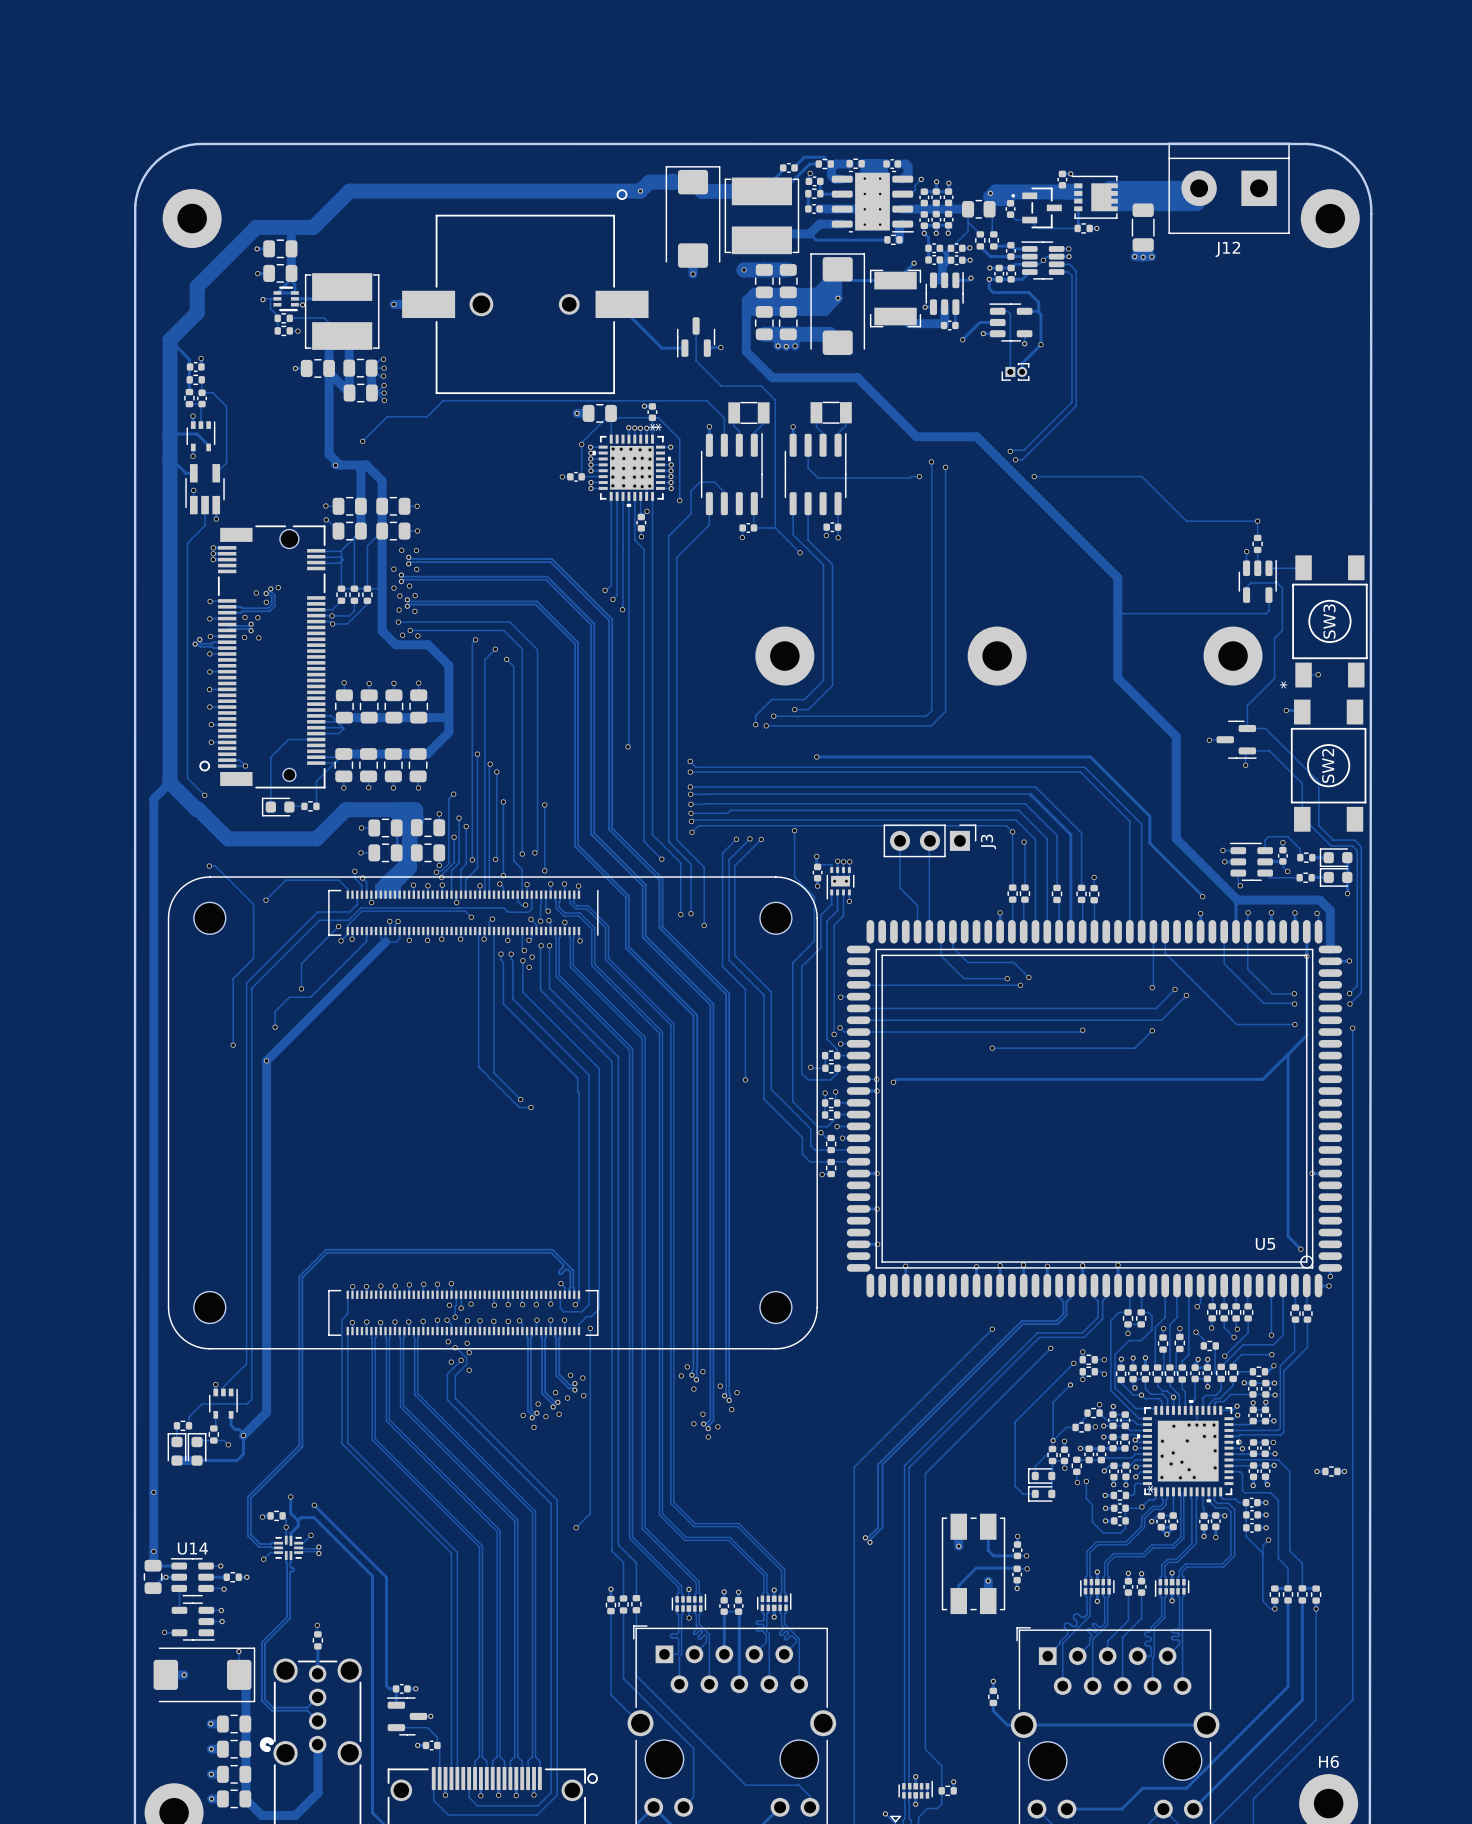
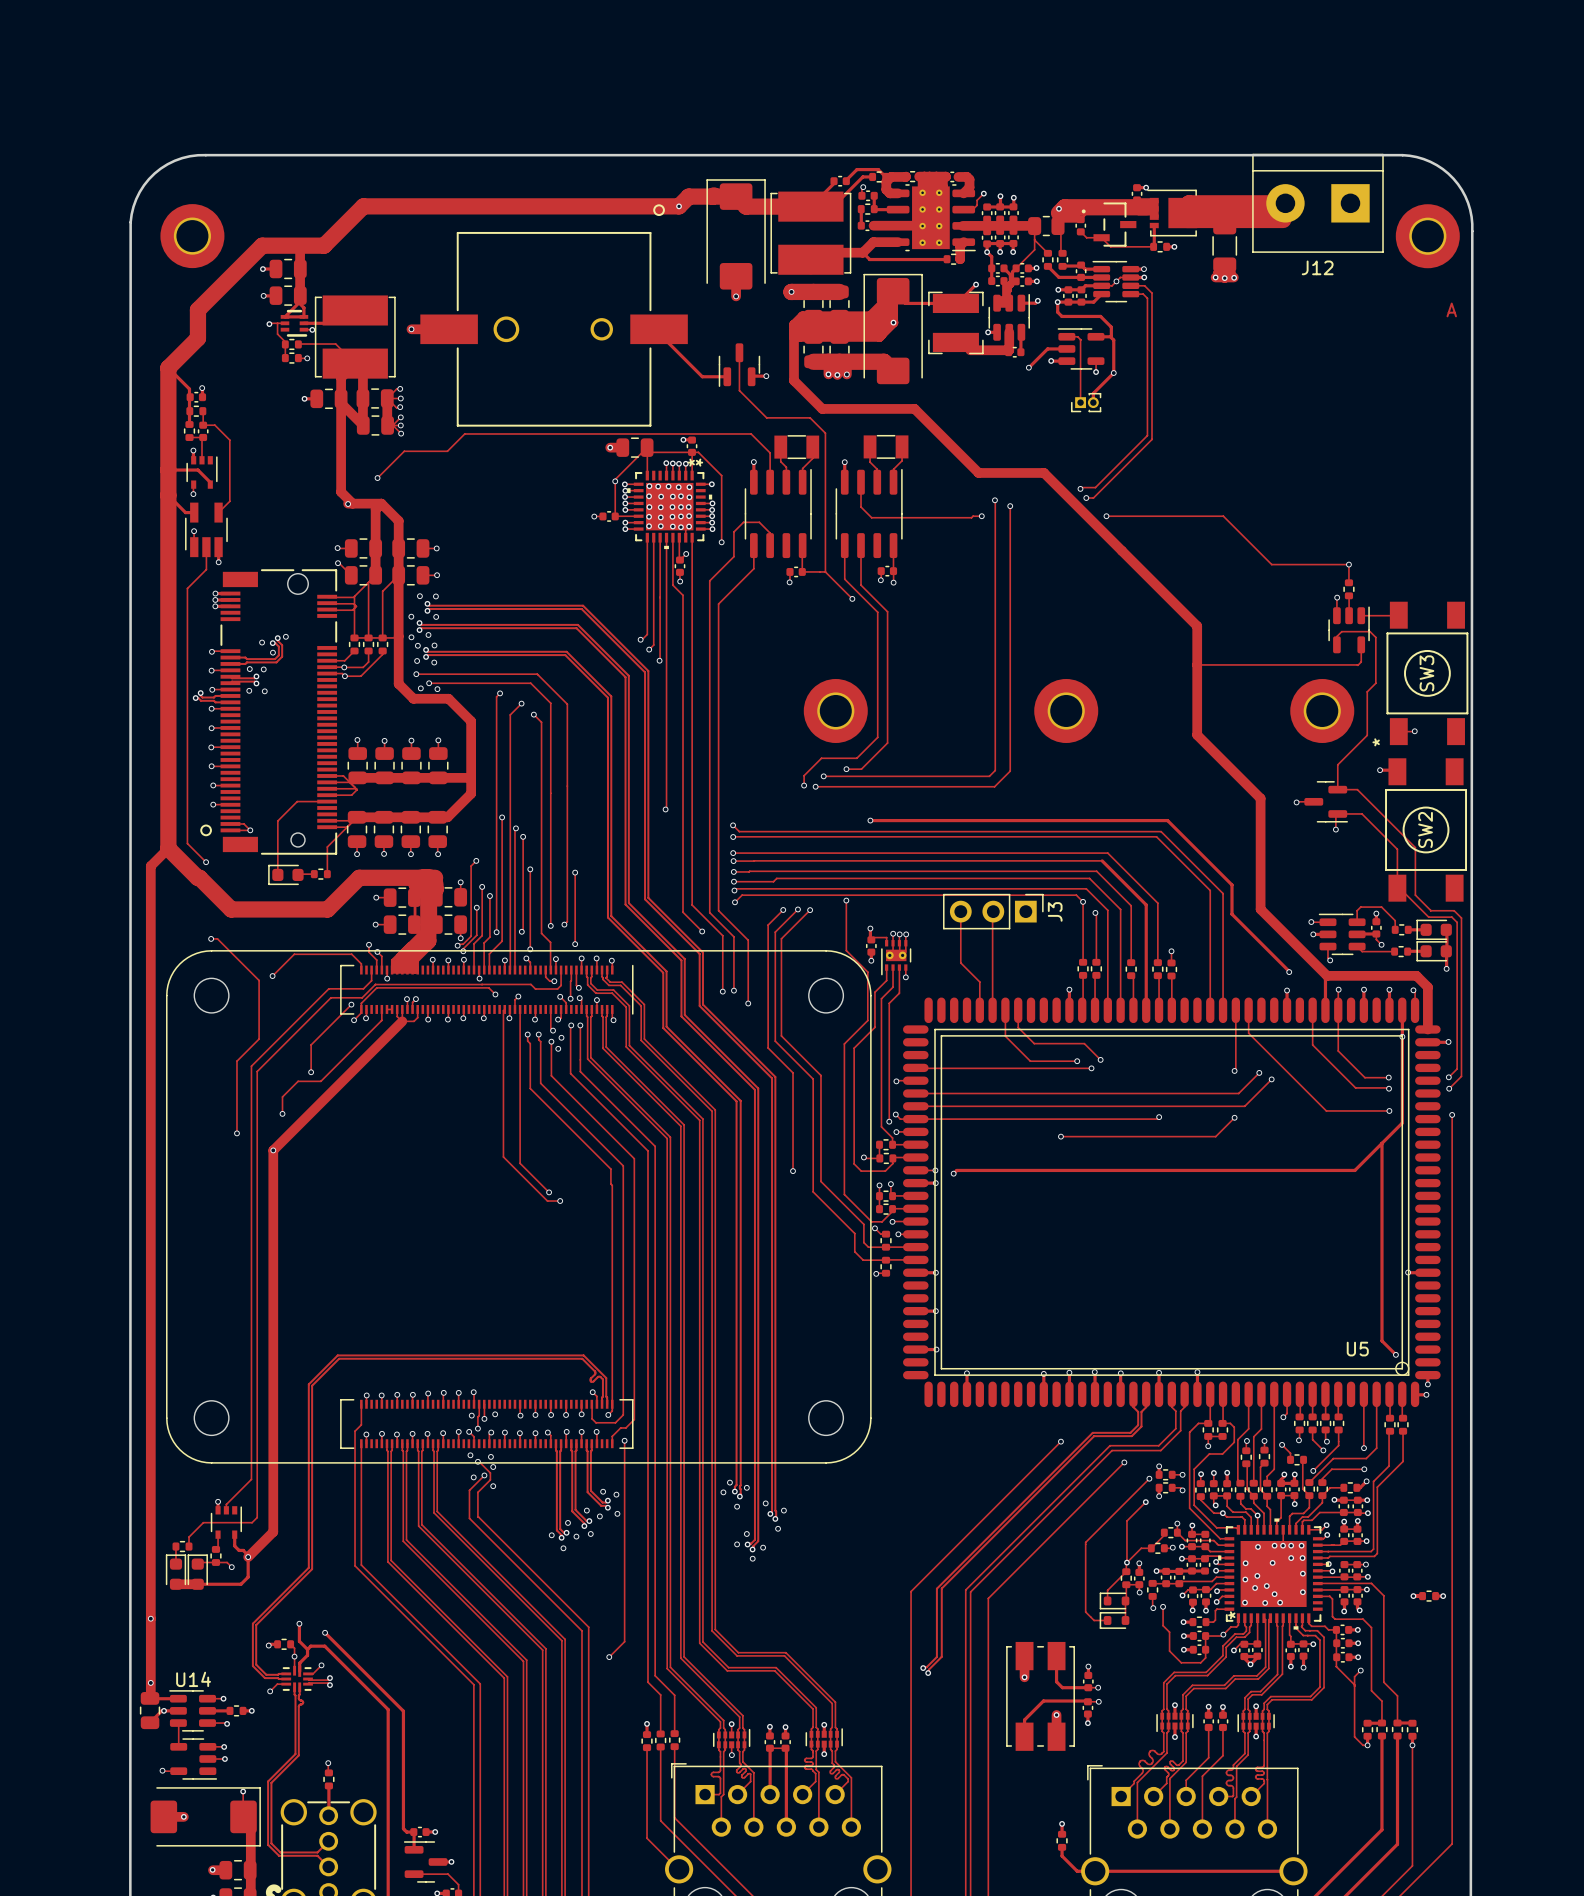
text: none -> A (1451, 309)

